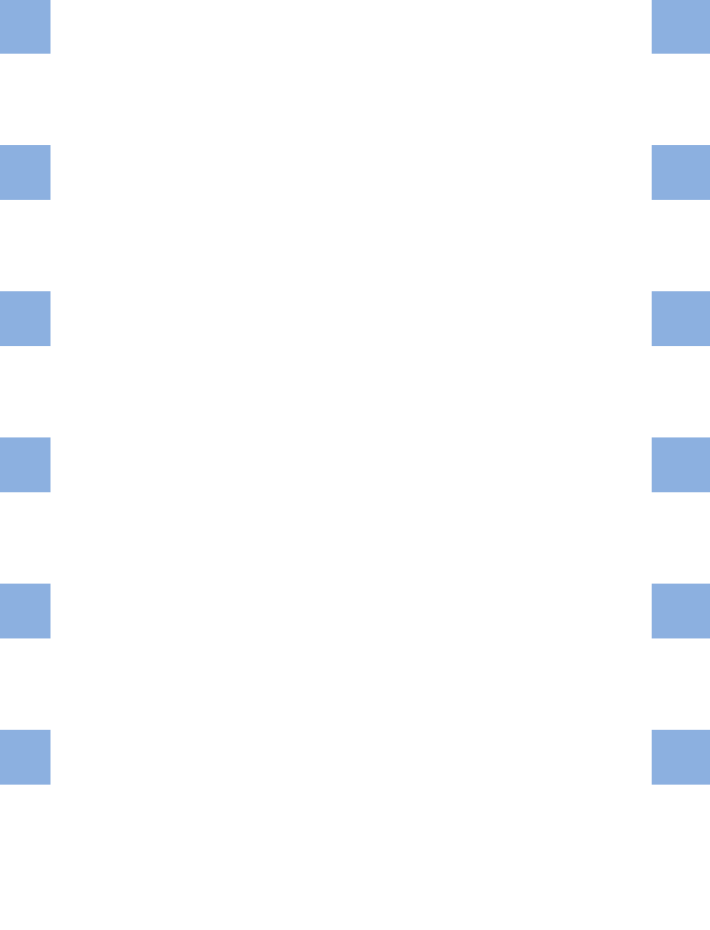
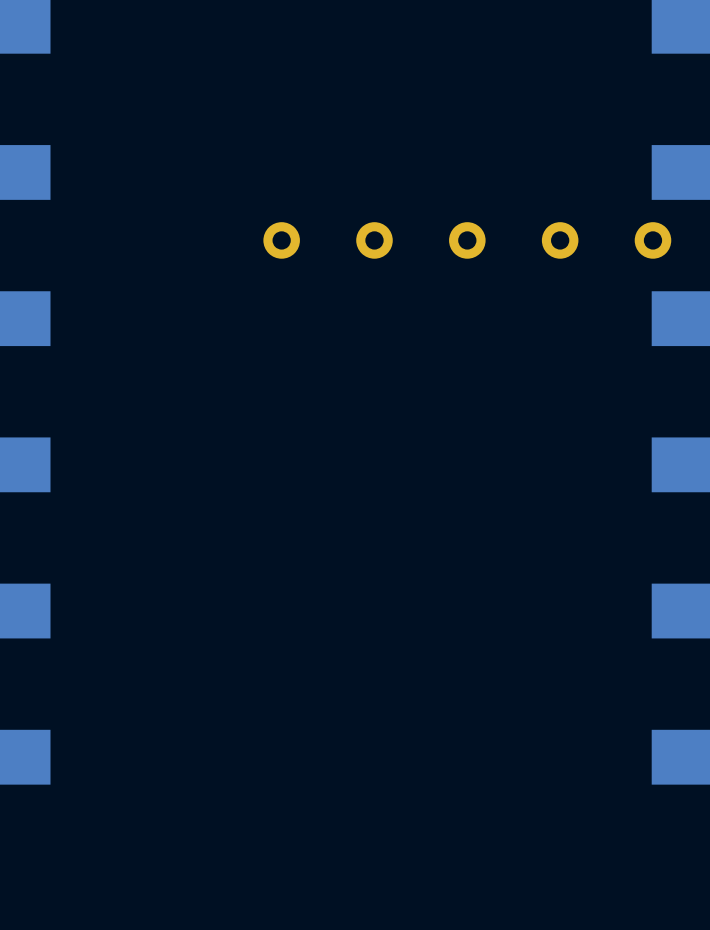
part: none -> (281, 240)
part: none -> (374, 240)
part: none -> (467, 240)
part: none -> (560, 240)
part: none -> (652, 240)

